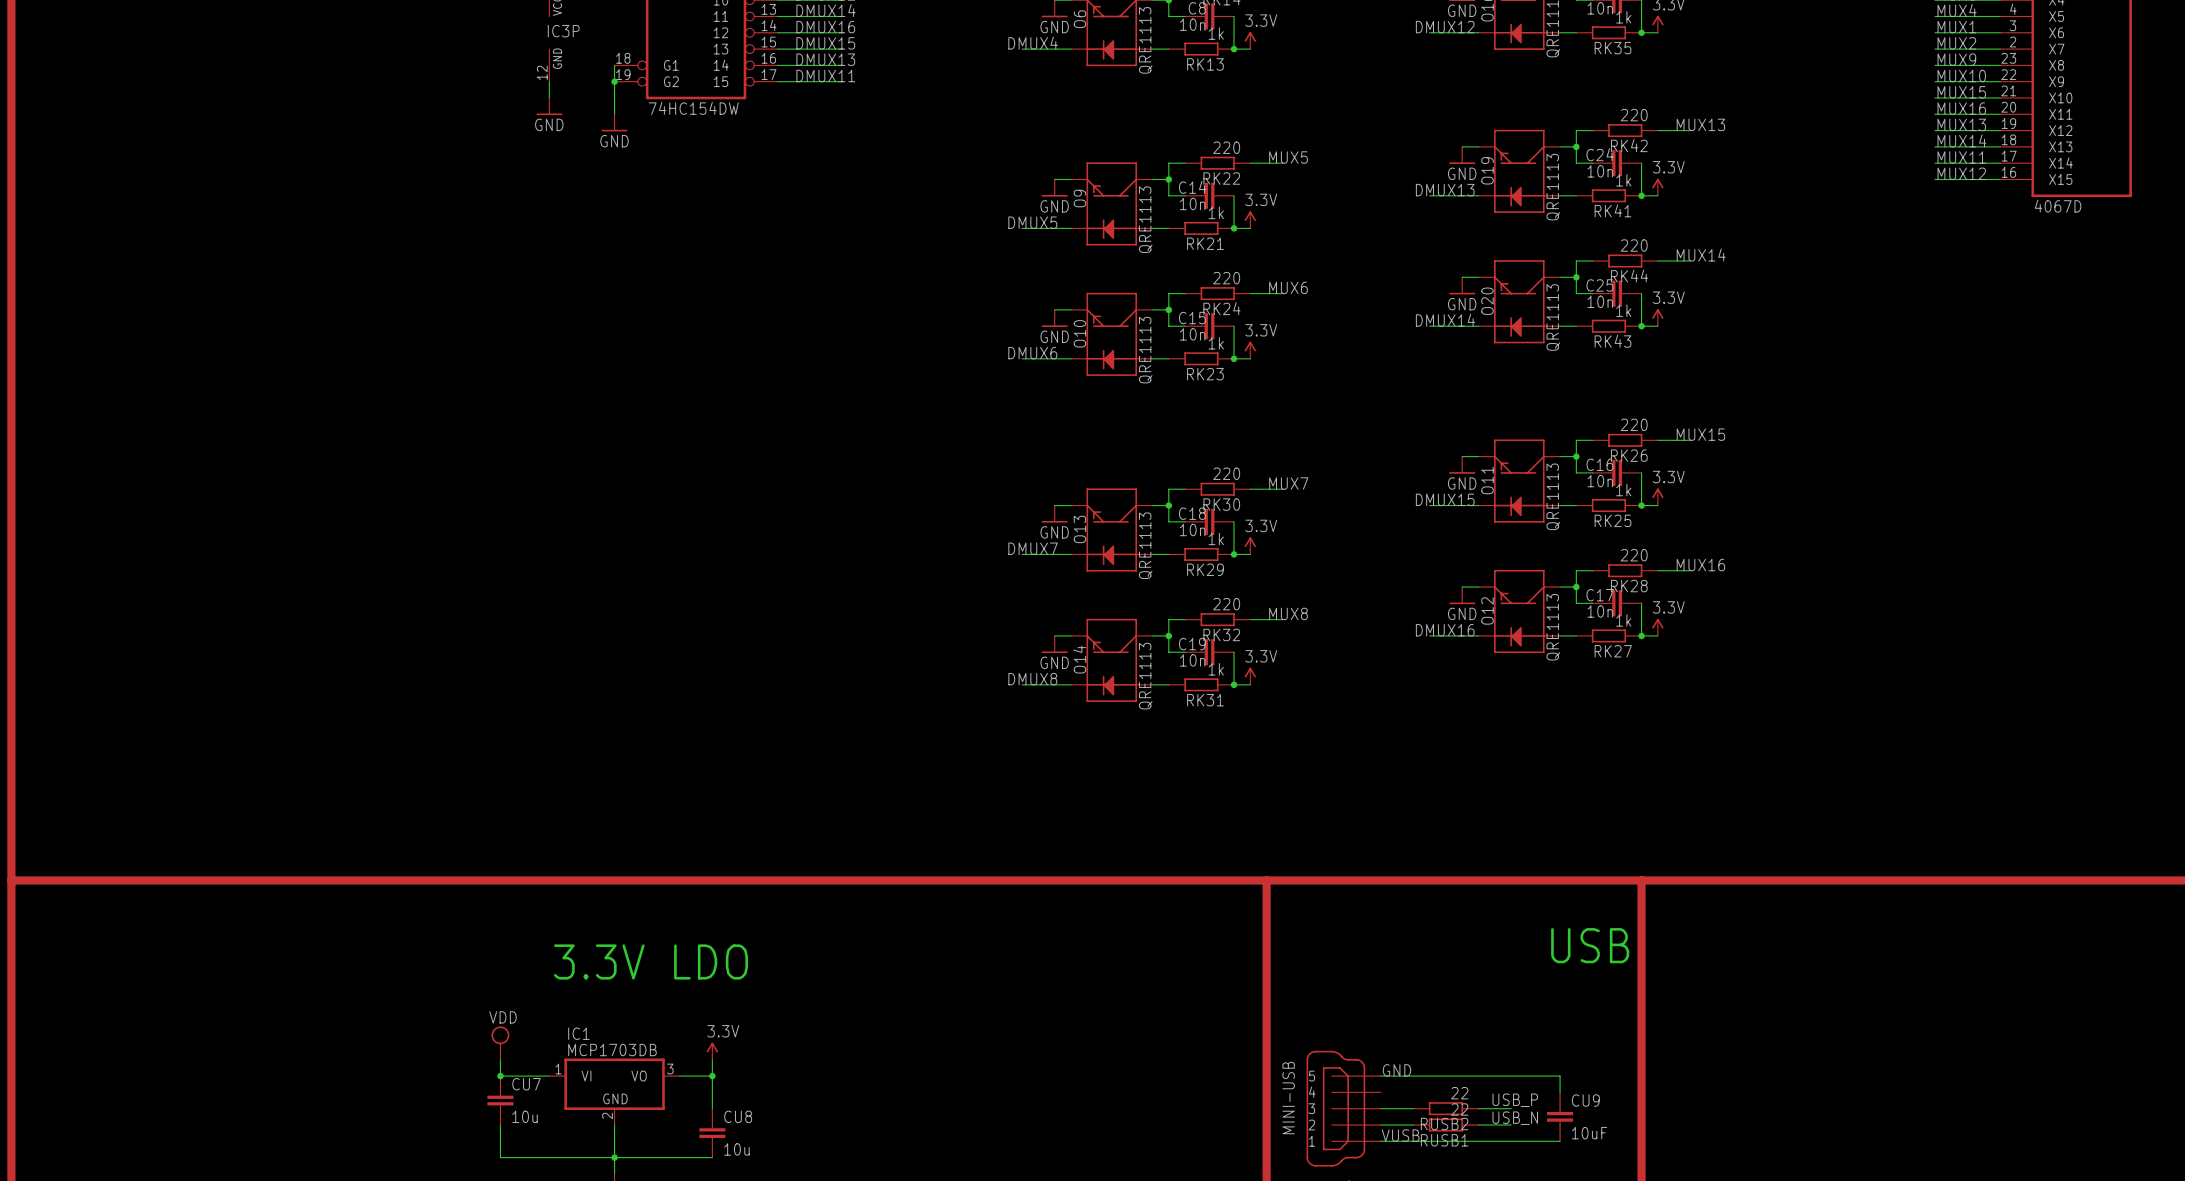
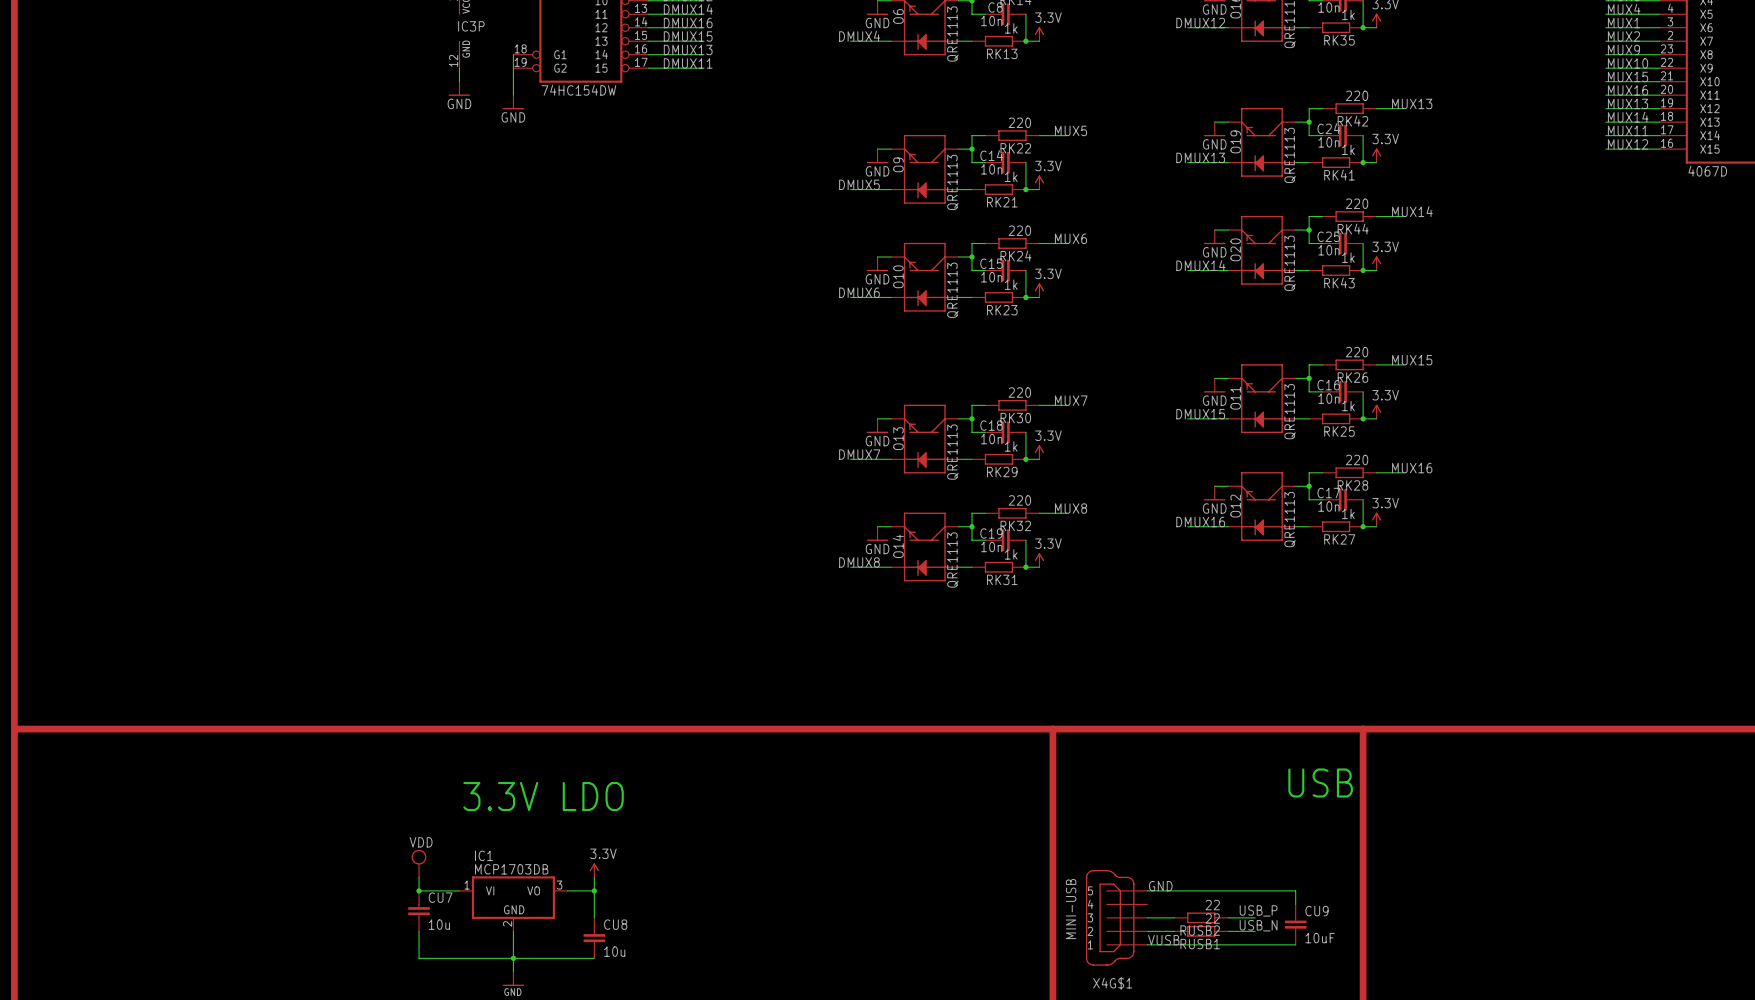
junction: (614, 81) -> none

